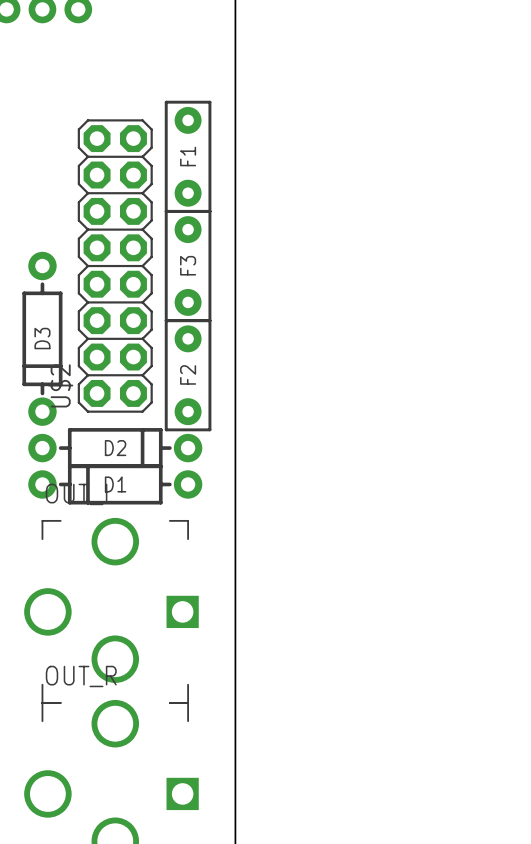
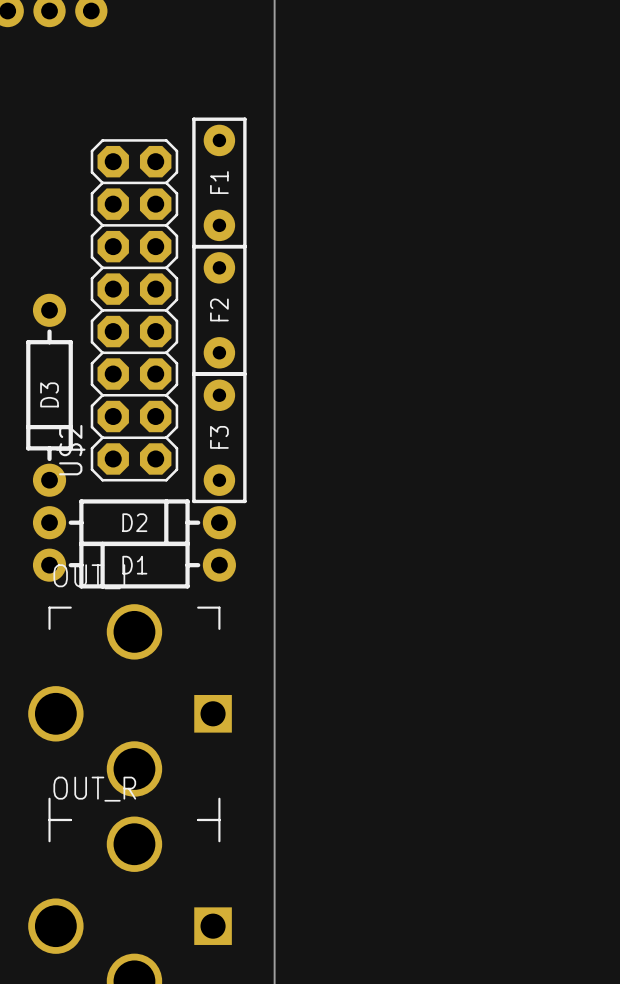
F3 name: F3 (188, 265) -> F2 (219, 309)
F2 name: F2 (188, 374) -> F3 (219, 437)

